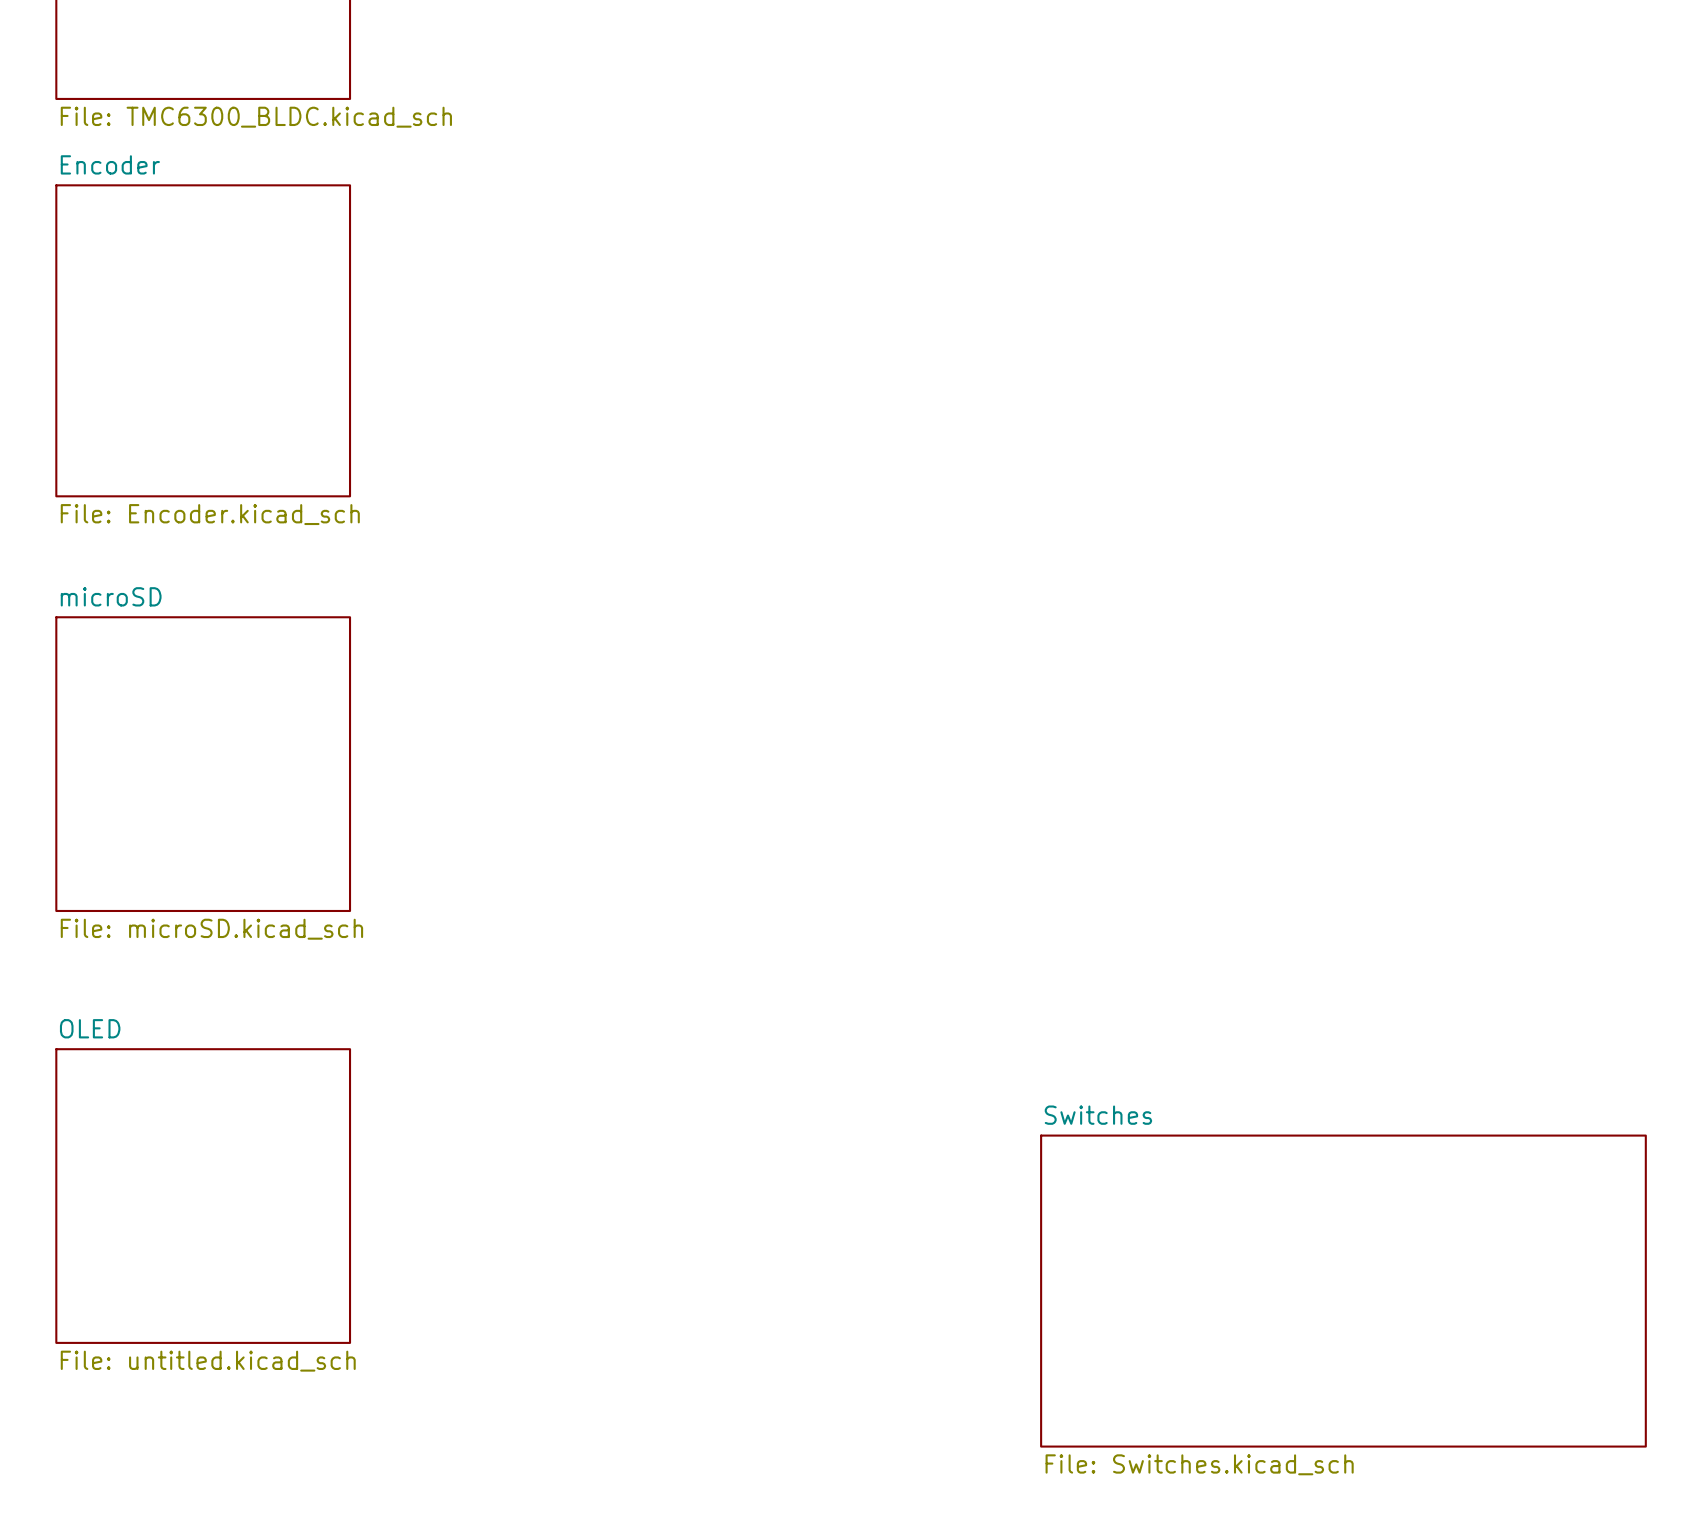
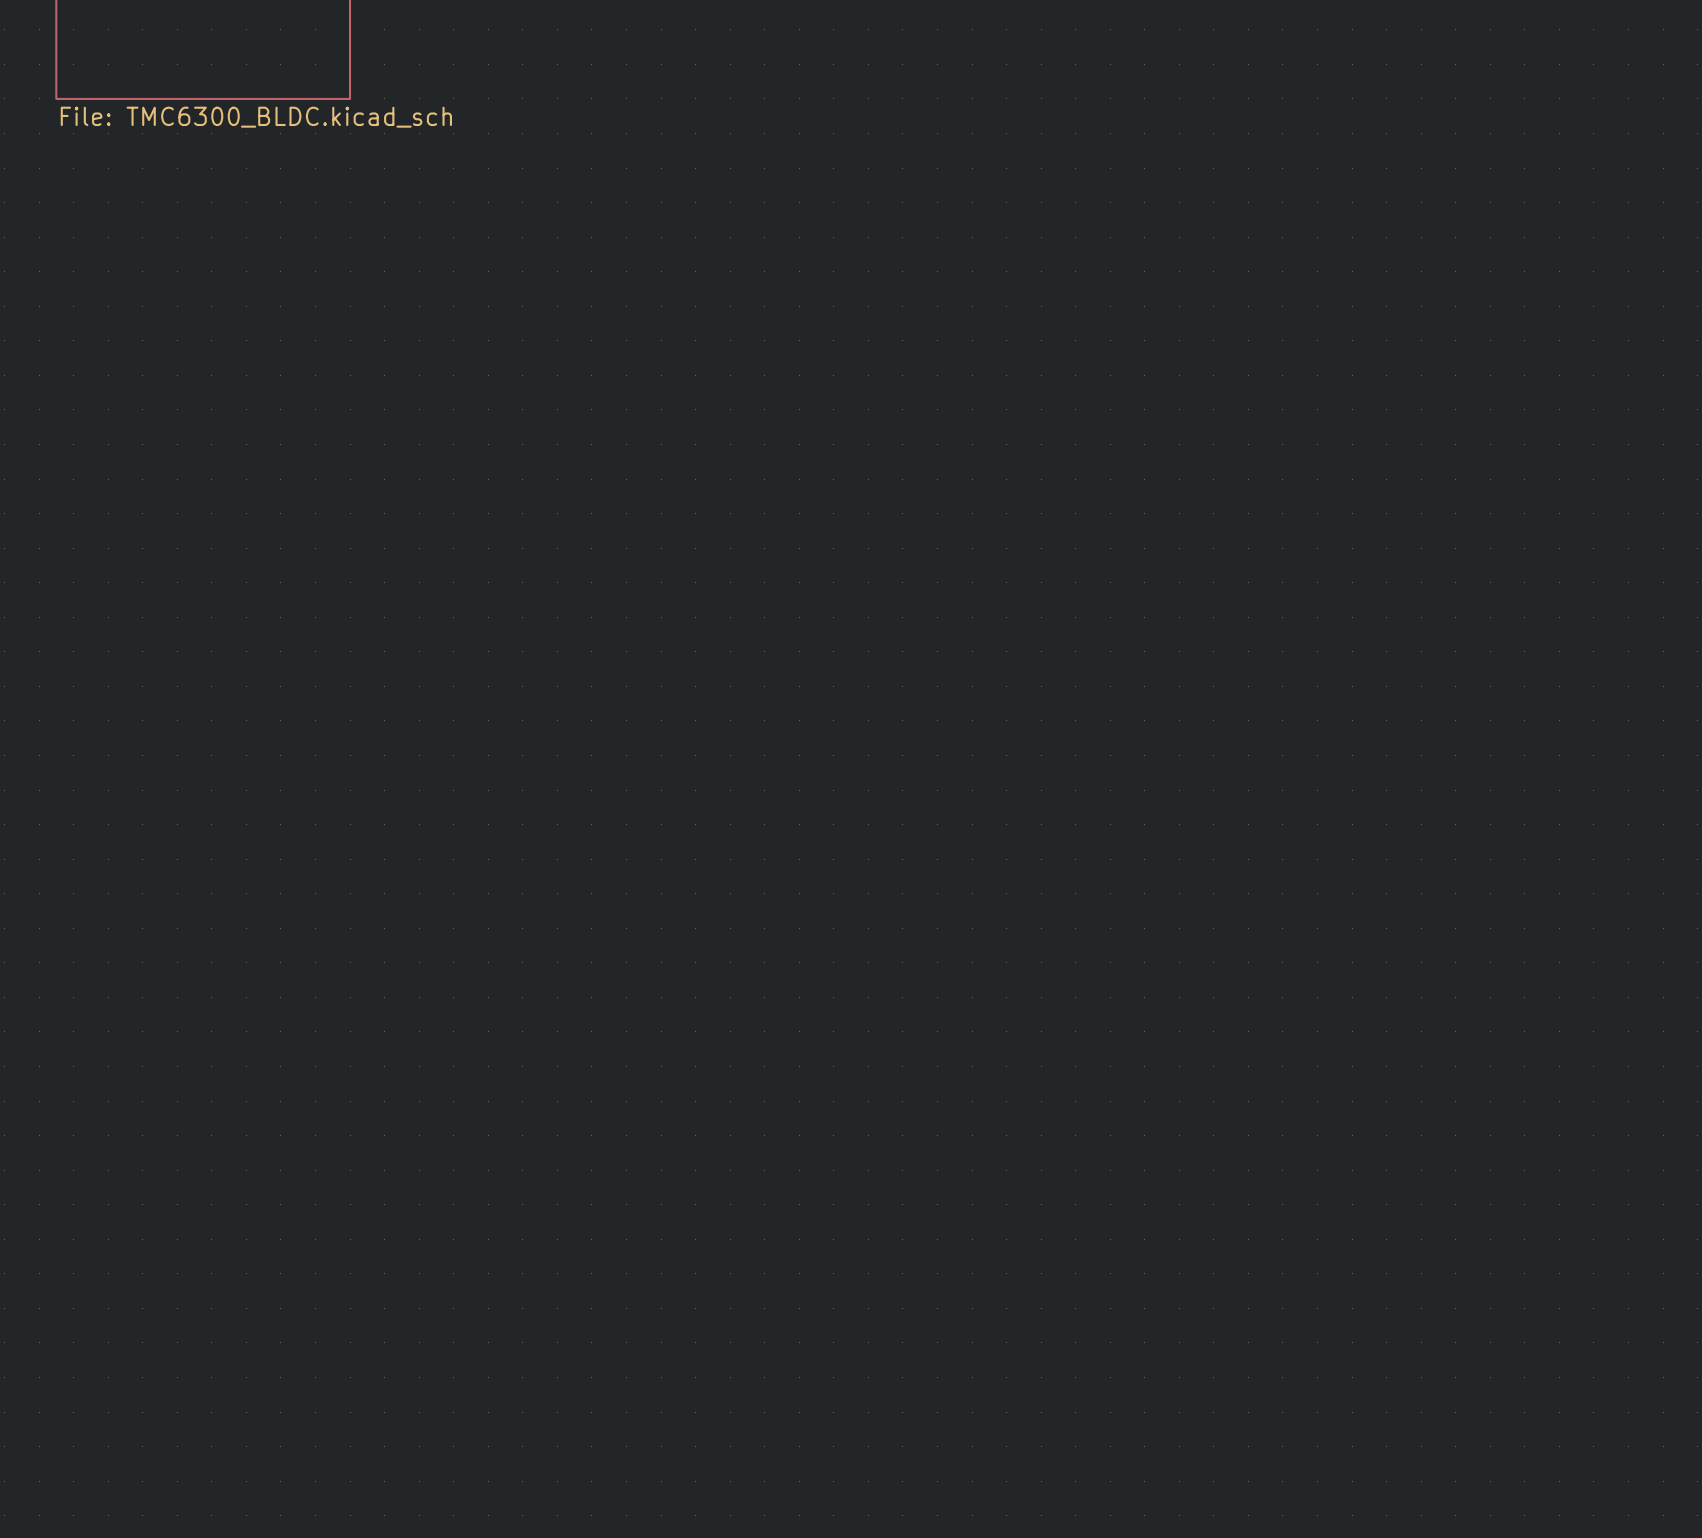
sheet Encoder: File: Encoder.kicad_sch (203, 340) -> none
sheet microSD: File: microSD.kicad_sch (203, 764) -> none
sheet OLED: File: untitled.kicad_sch (203, 1196) -> none
sheet Switches: File: Switches.kicad_sch (1343, 1291) -> none

